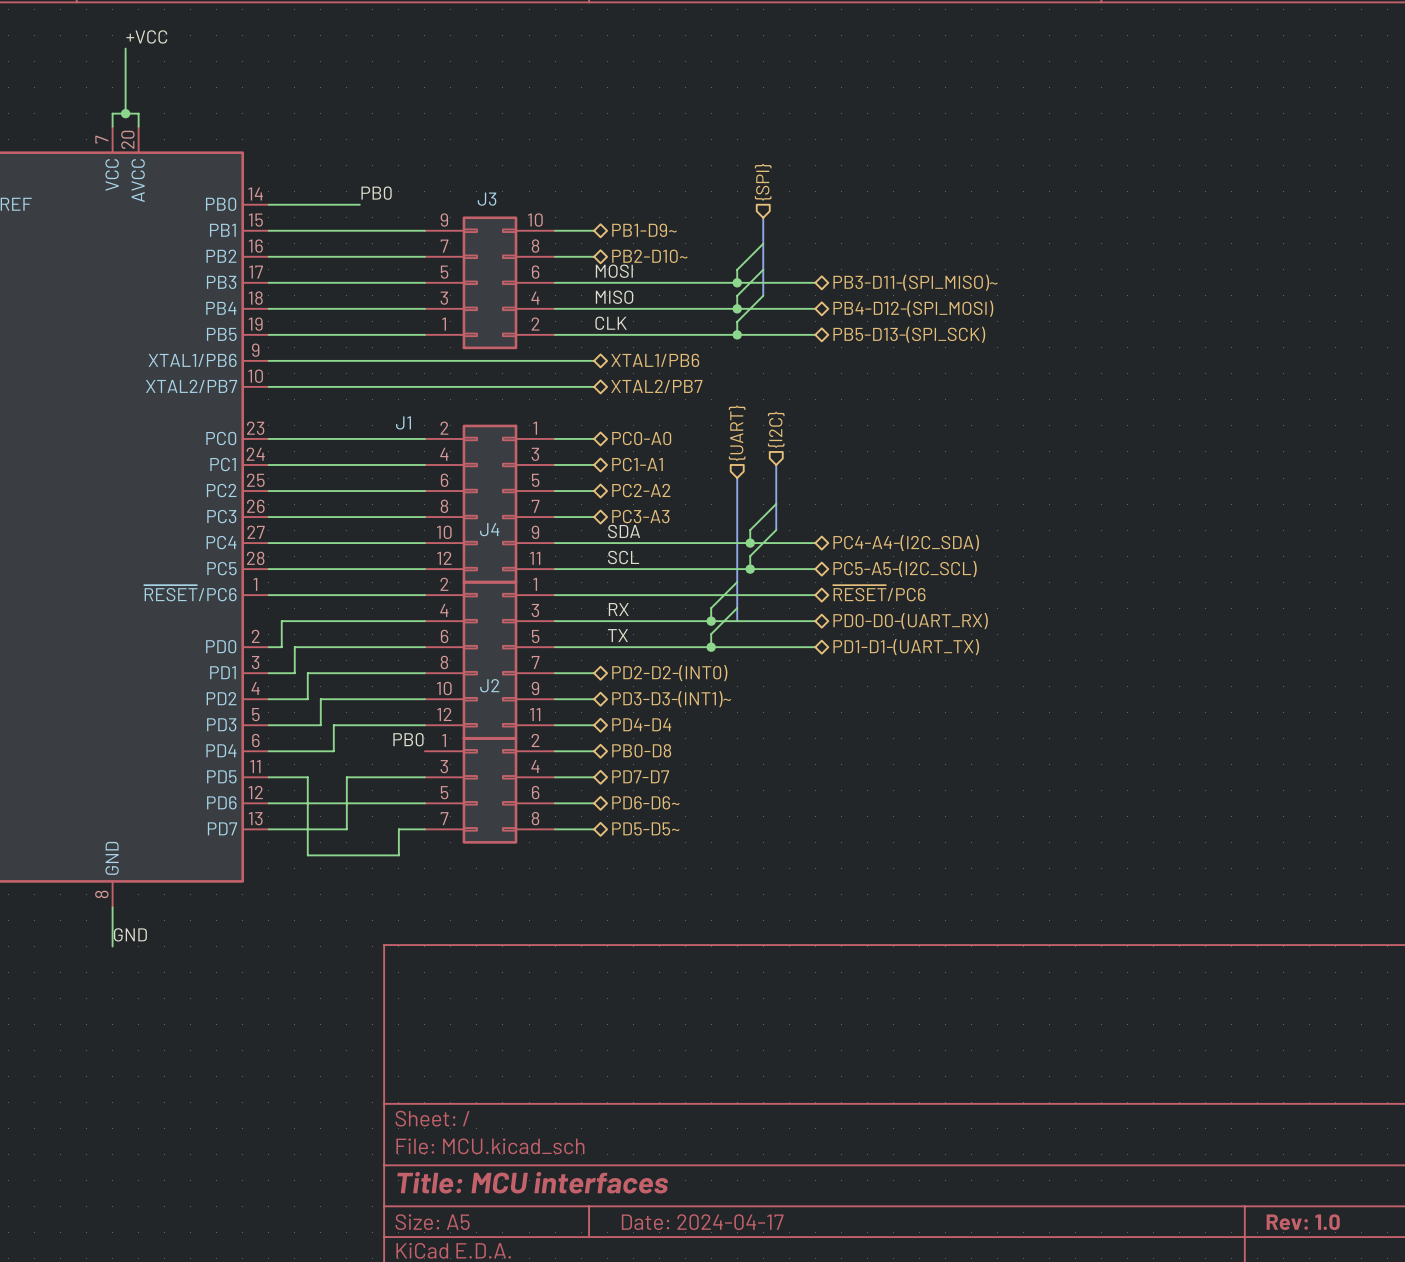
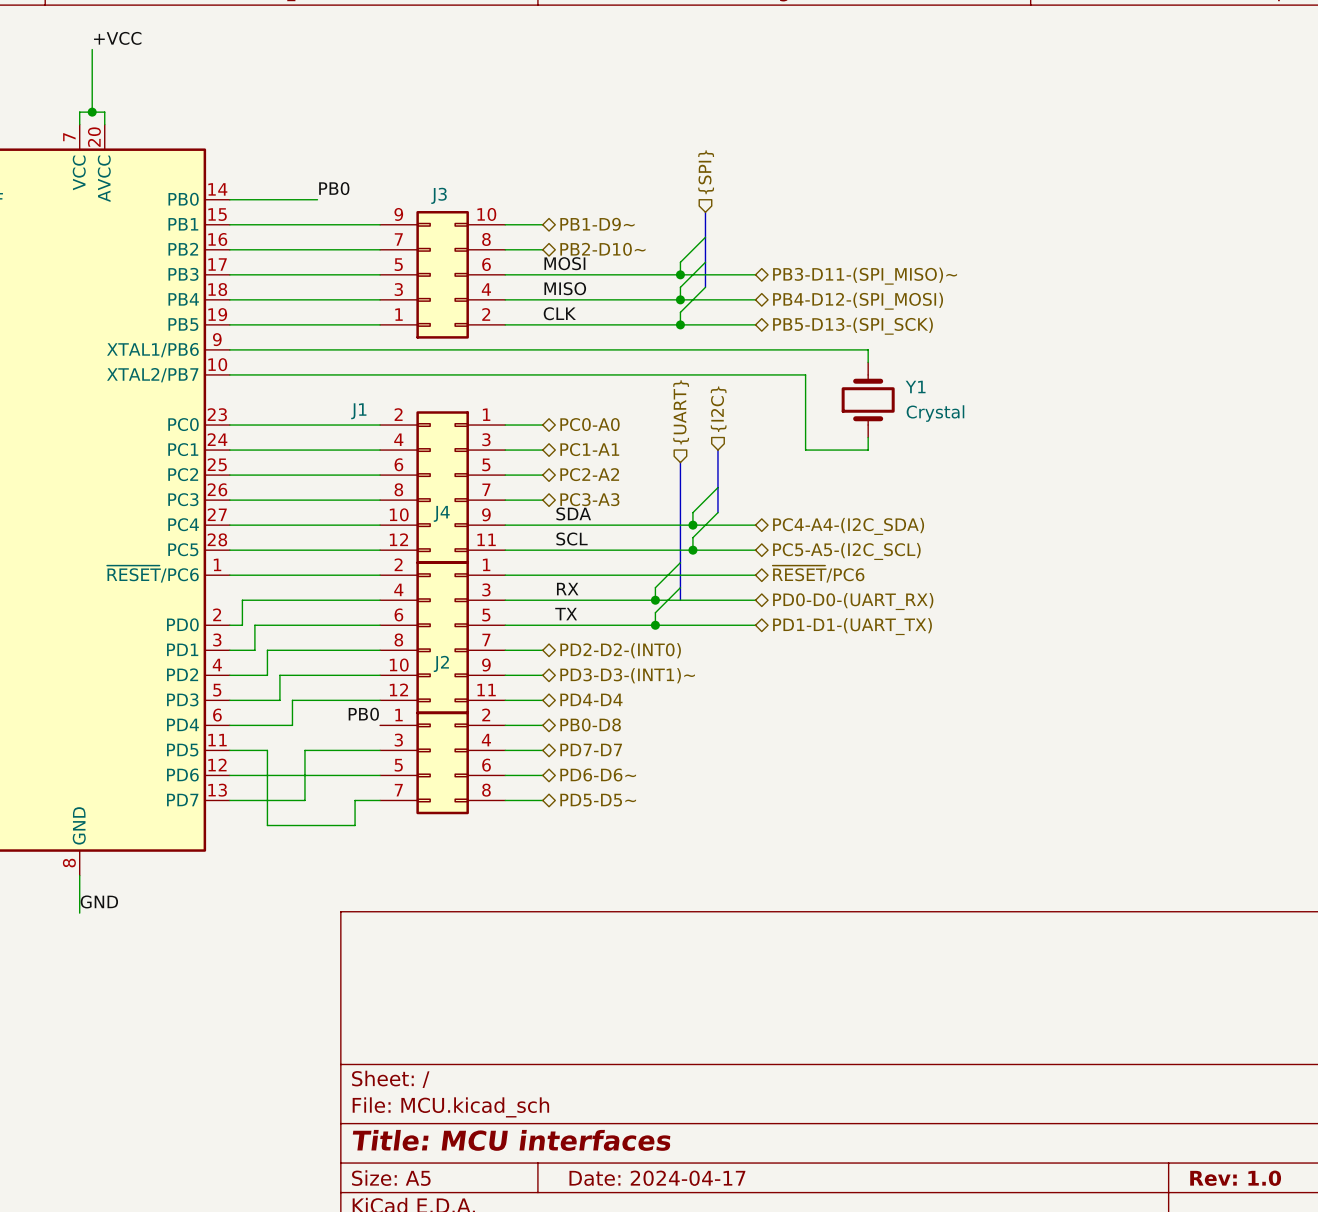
wire: none -> (542, 349) (868, 349) (868, 362)
hierarchical label: XTAL1/PB6 (655, 360) -> none
wire: none -> (542, 374) (805, 374) (805, 450) (868, 450) (868, 437)
hierarchical label: XTAL2/PB7 (656, 386) -> none
Y1: none -> Crystal (868, 399)

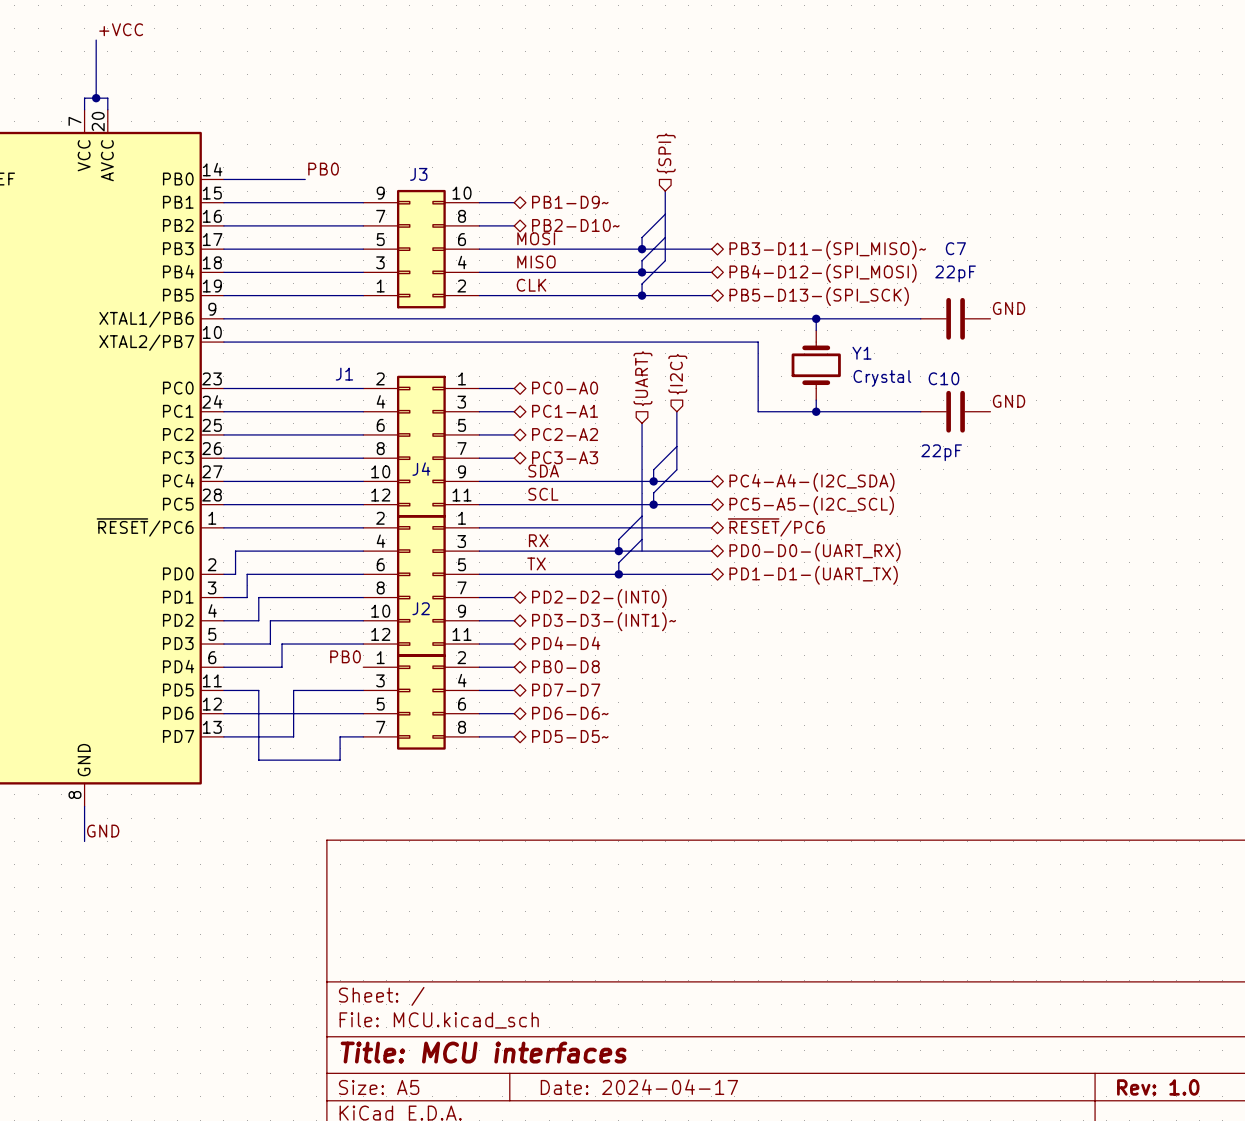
label: none -> GND (1009, 308)
wire: none -> (816, 318) (920, 318)
junction: none -> (816, 318)
C7: none -> 22pF (955, 318)
label: none -> GND (1009, 401)
wire: none -> (816, 411) (920, 411)
junction: none -> (816, 411)
C10: none -> 22pF (955, 411)

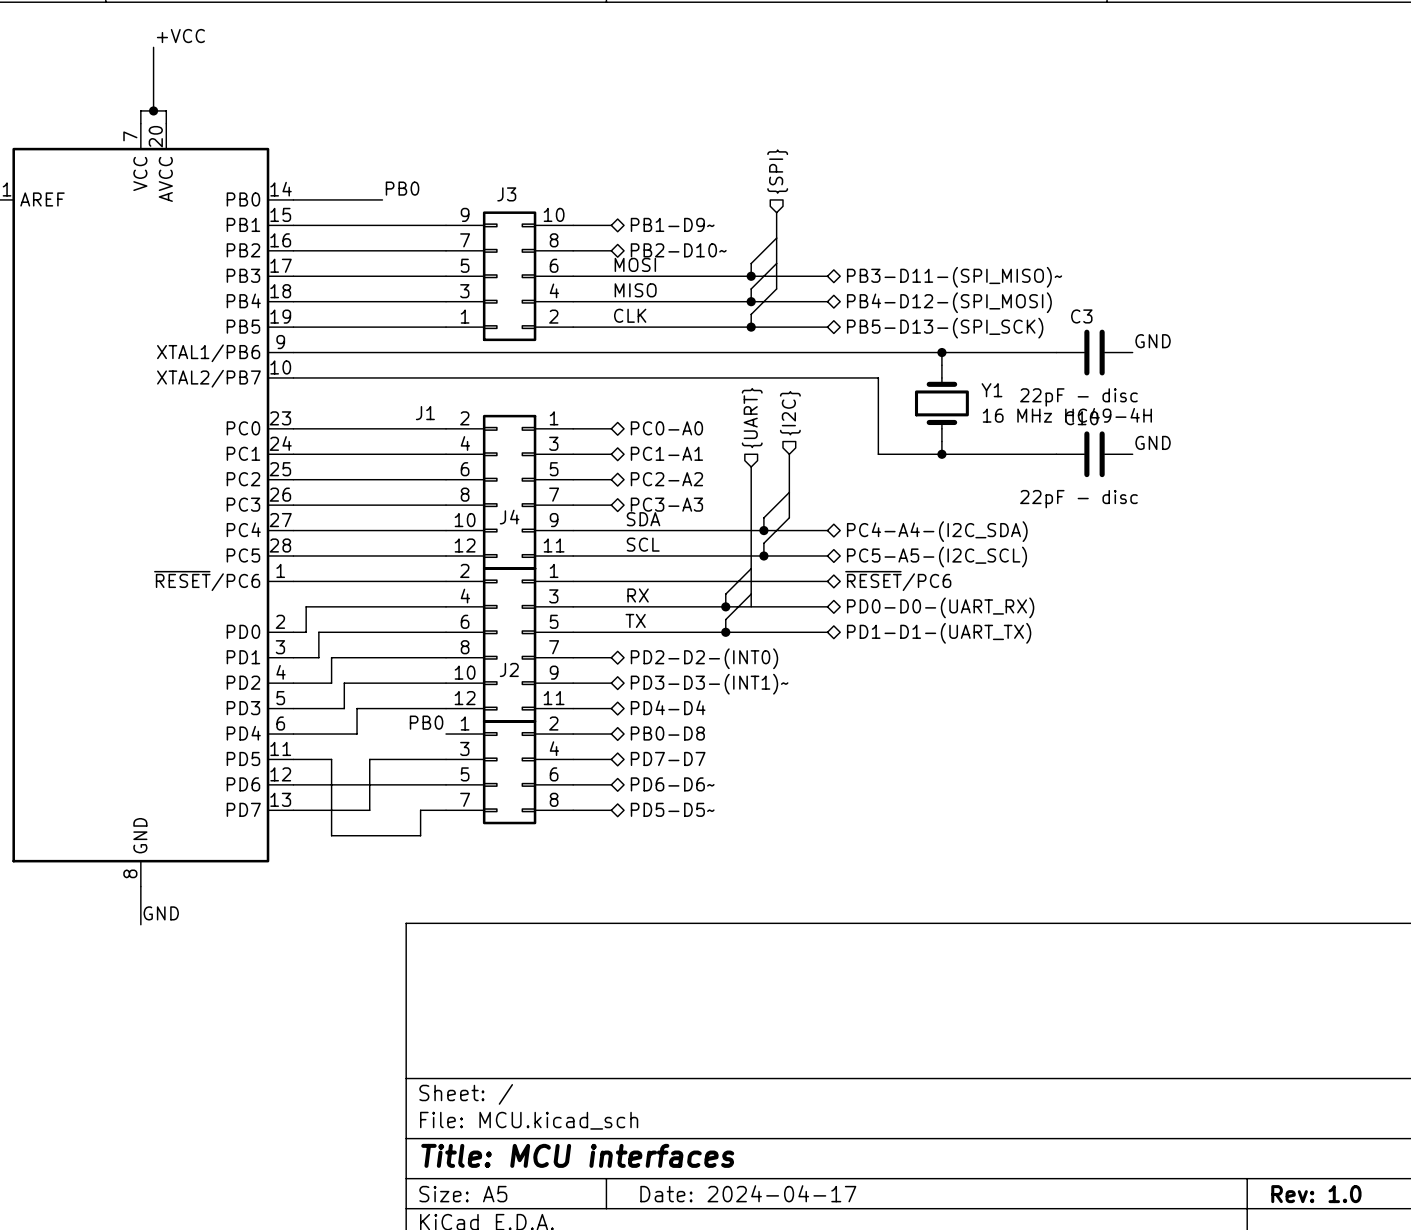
C7 name: C7 (955, 248) -> C3 (1081, 316)
C7 value: 22pF (955, 273) -> 22pF - disc (1078, 397)
Y1 value: Crystal (882, 378) -> 16 MHz HC49-4H (1067, 415)
C10 value: 22pF (941, 452) -> 22pF - disc (1078, 499)

